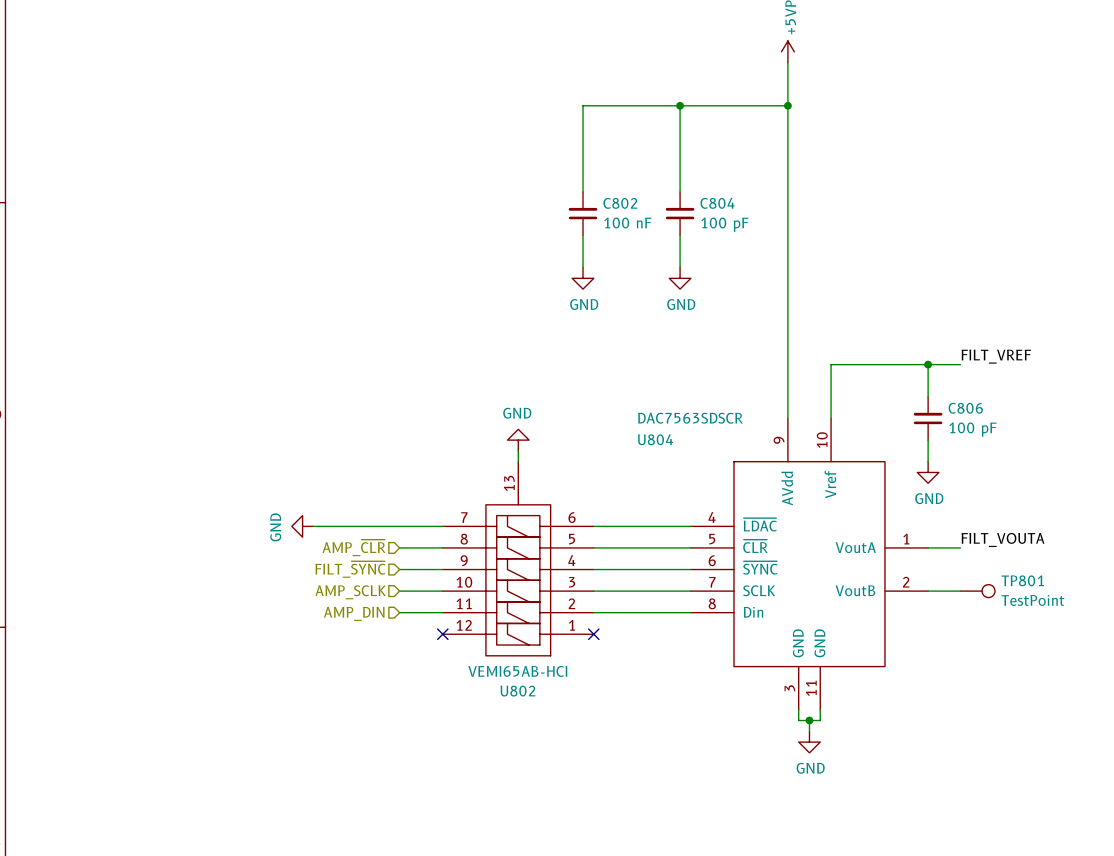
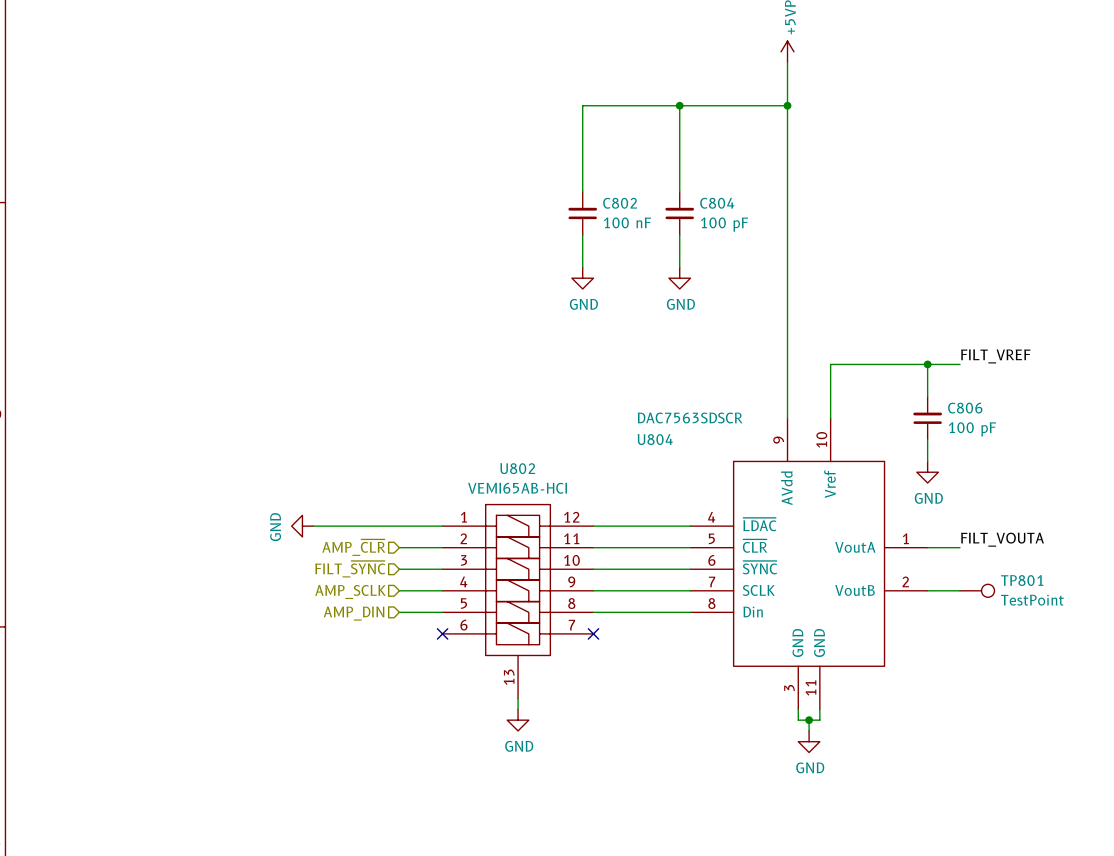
power symbol: GND (518, 440) -> none
wire: (518, 450) (518, 461) -> none
U802 rotation: 0° (518, 580) -> 180° (518, 580)
wire: none -> (518, 698) (518, 709)
power symbol: none -> GND (518, 720)

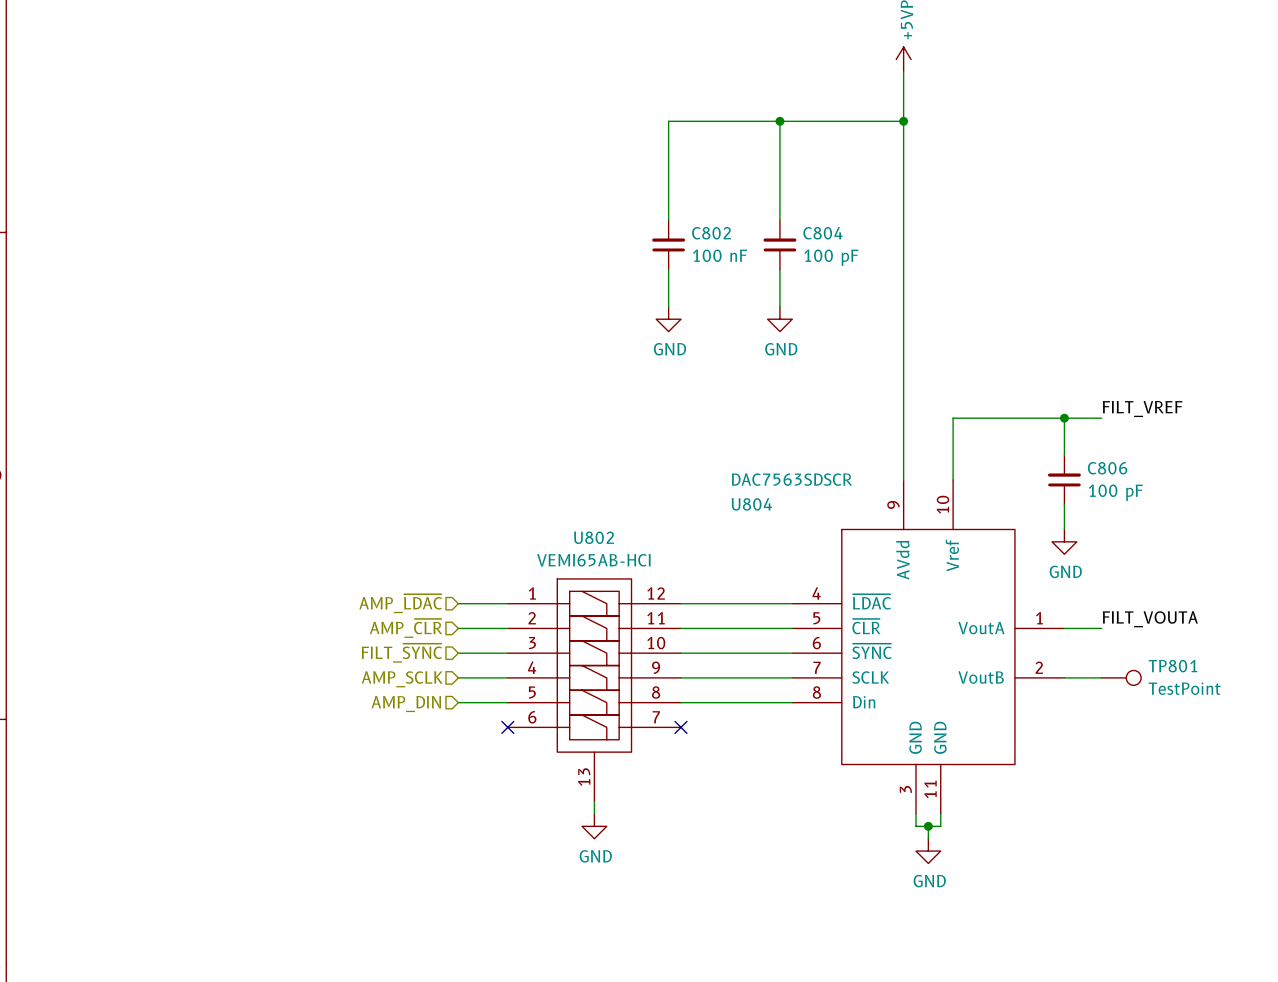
power symbol: GND (302, 526) -> none
wire: (313, 526) (399, 526) -> none
hierarchical label: none -> AMP_~{LDAC} (400, 603)

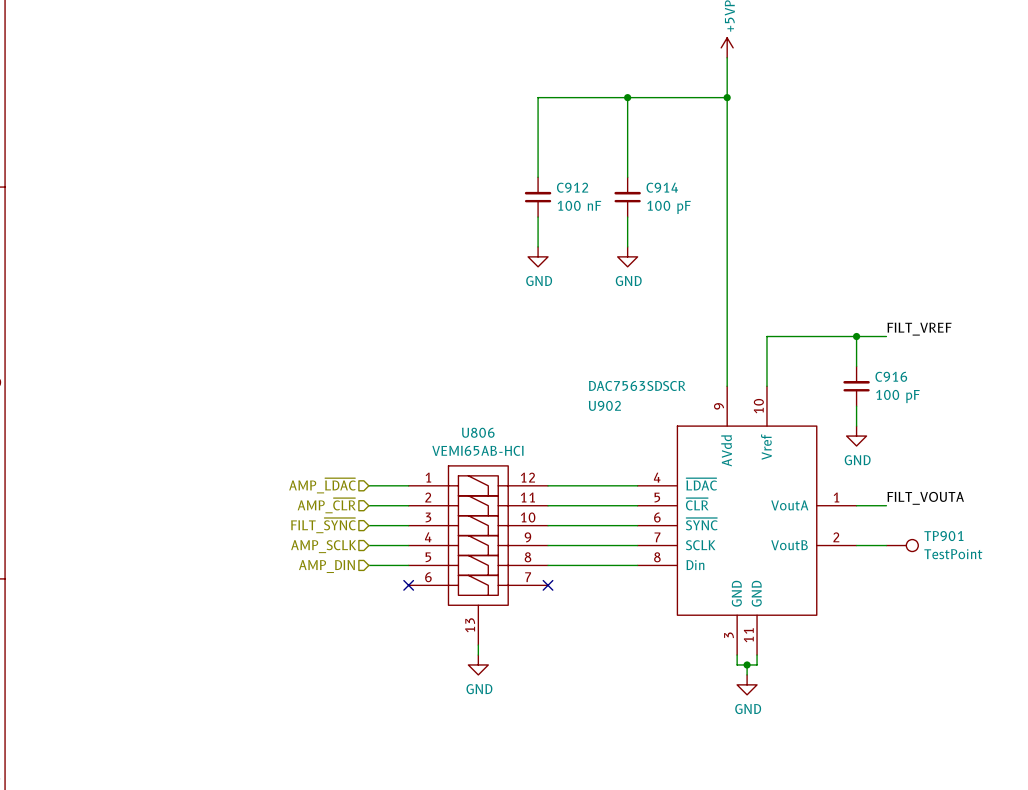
C802 name: C802 (711, 233) -> C912 (572, 187)
C804 name: C804 (823, 233) -> C914 (662, 187)
C806 name: C806 (1107, 468) -> C916 (891, 376)
U804 name: U804 (751, 504) -> U902 (604, 405)
U802 name: U802 (594, 537) -> U806 (478, 432)
TP801 name: TP801 (1172, 666) -> TP901 (943, 536)

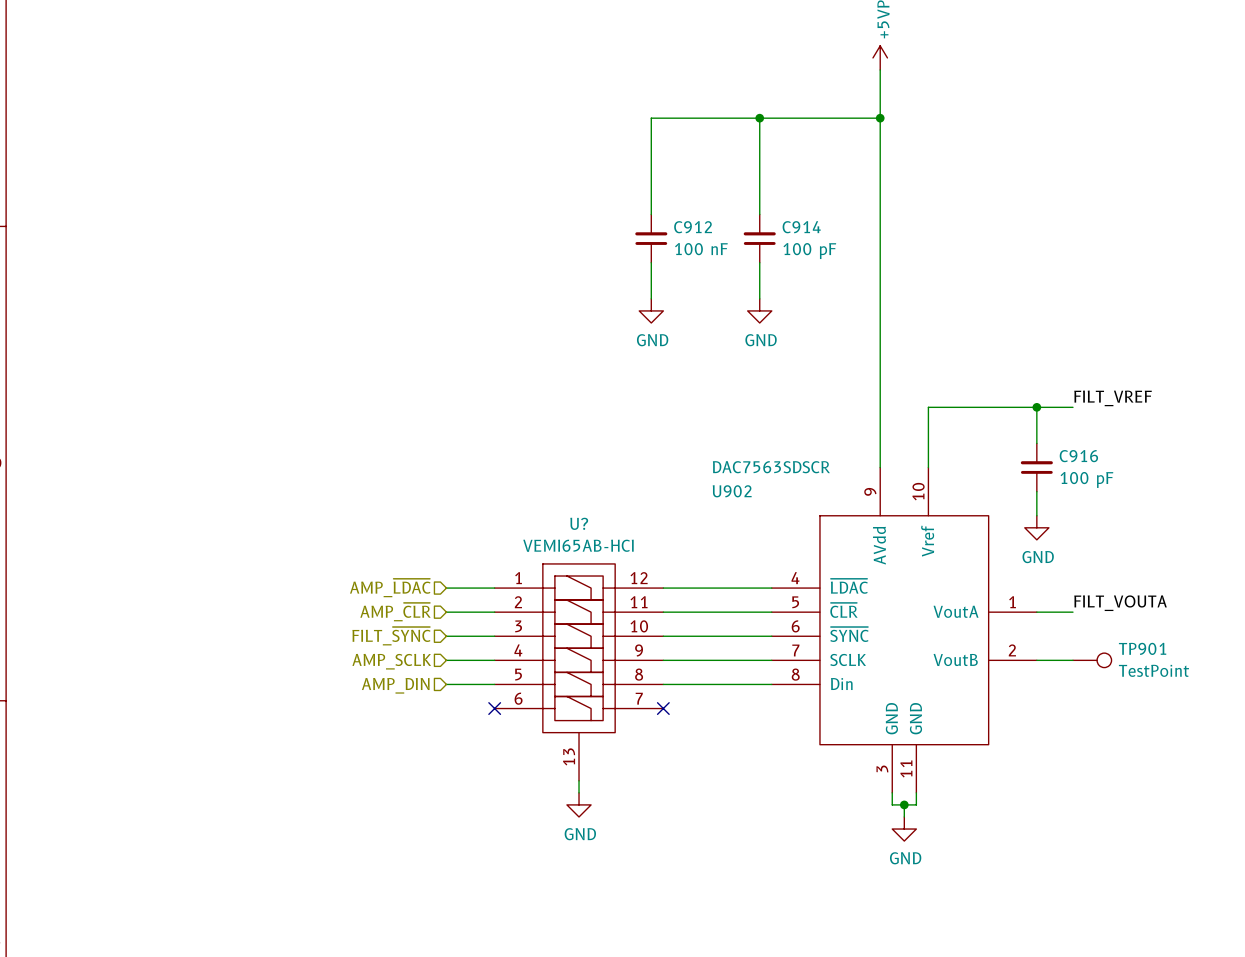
U806 name: U806 (478, 432) -> U? (579, 523)

